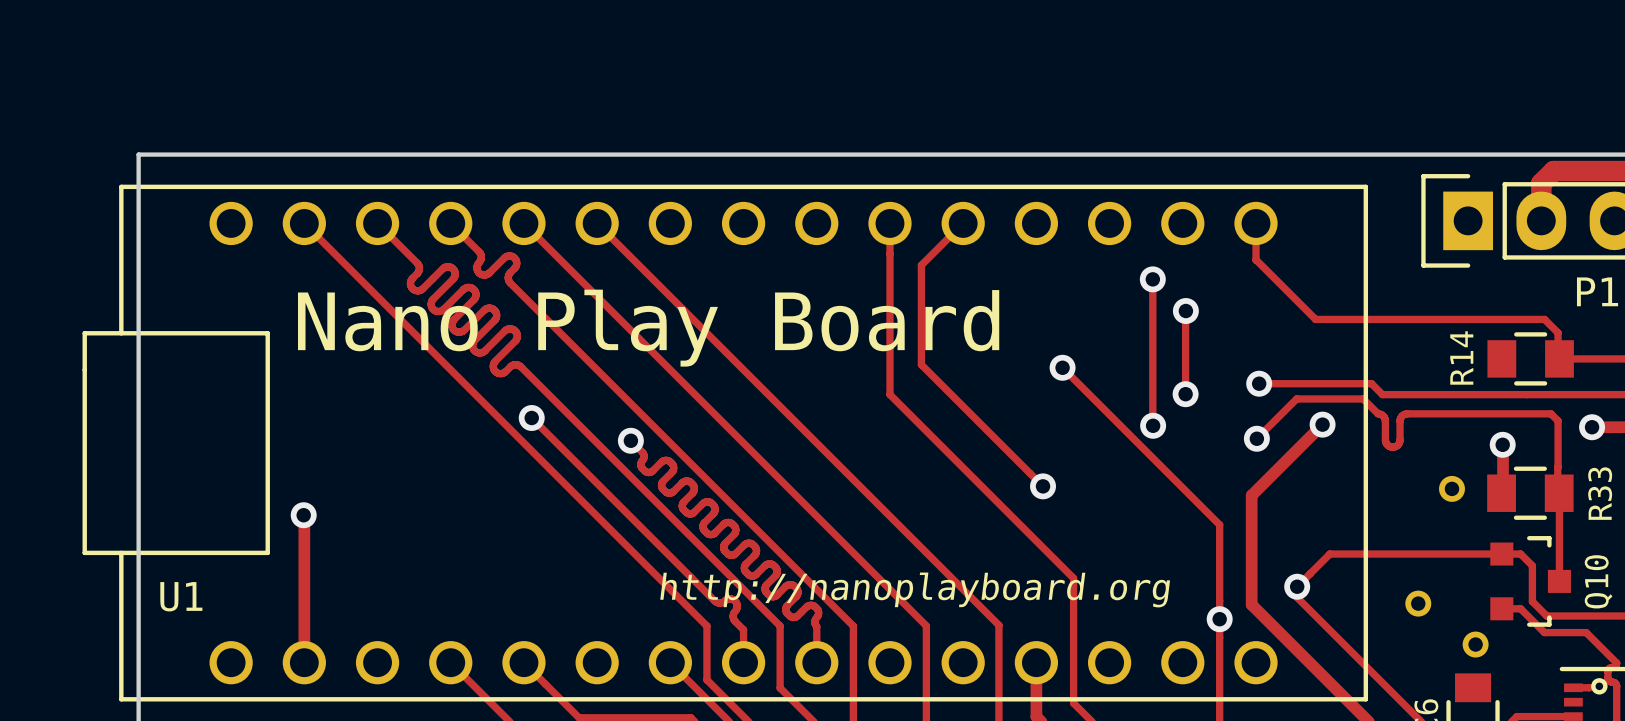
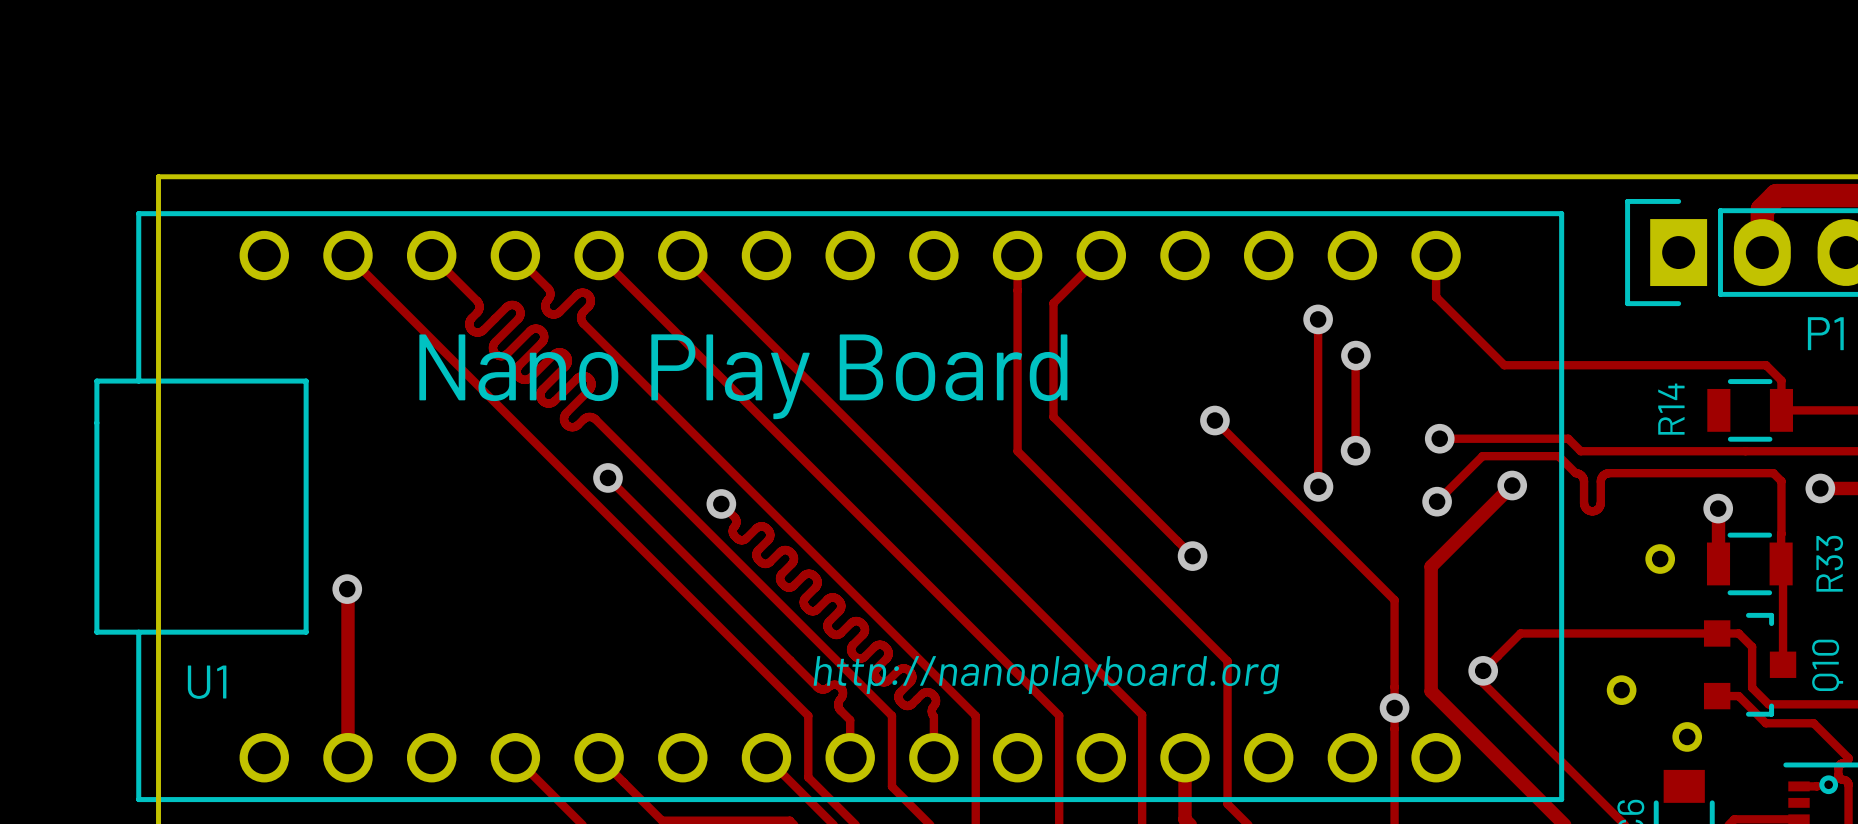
R14 footprint: [1487, 332, 1574, 386] -> [1707, 379, 1793, 442]
R33 footprint: [1487, 466, 1574, 520] -> [1706, 532, 1793, 596]

